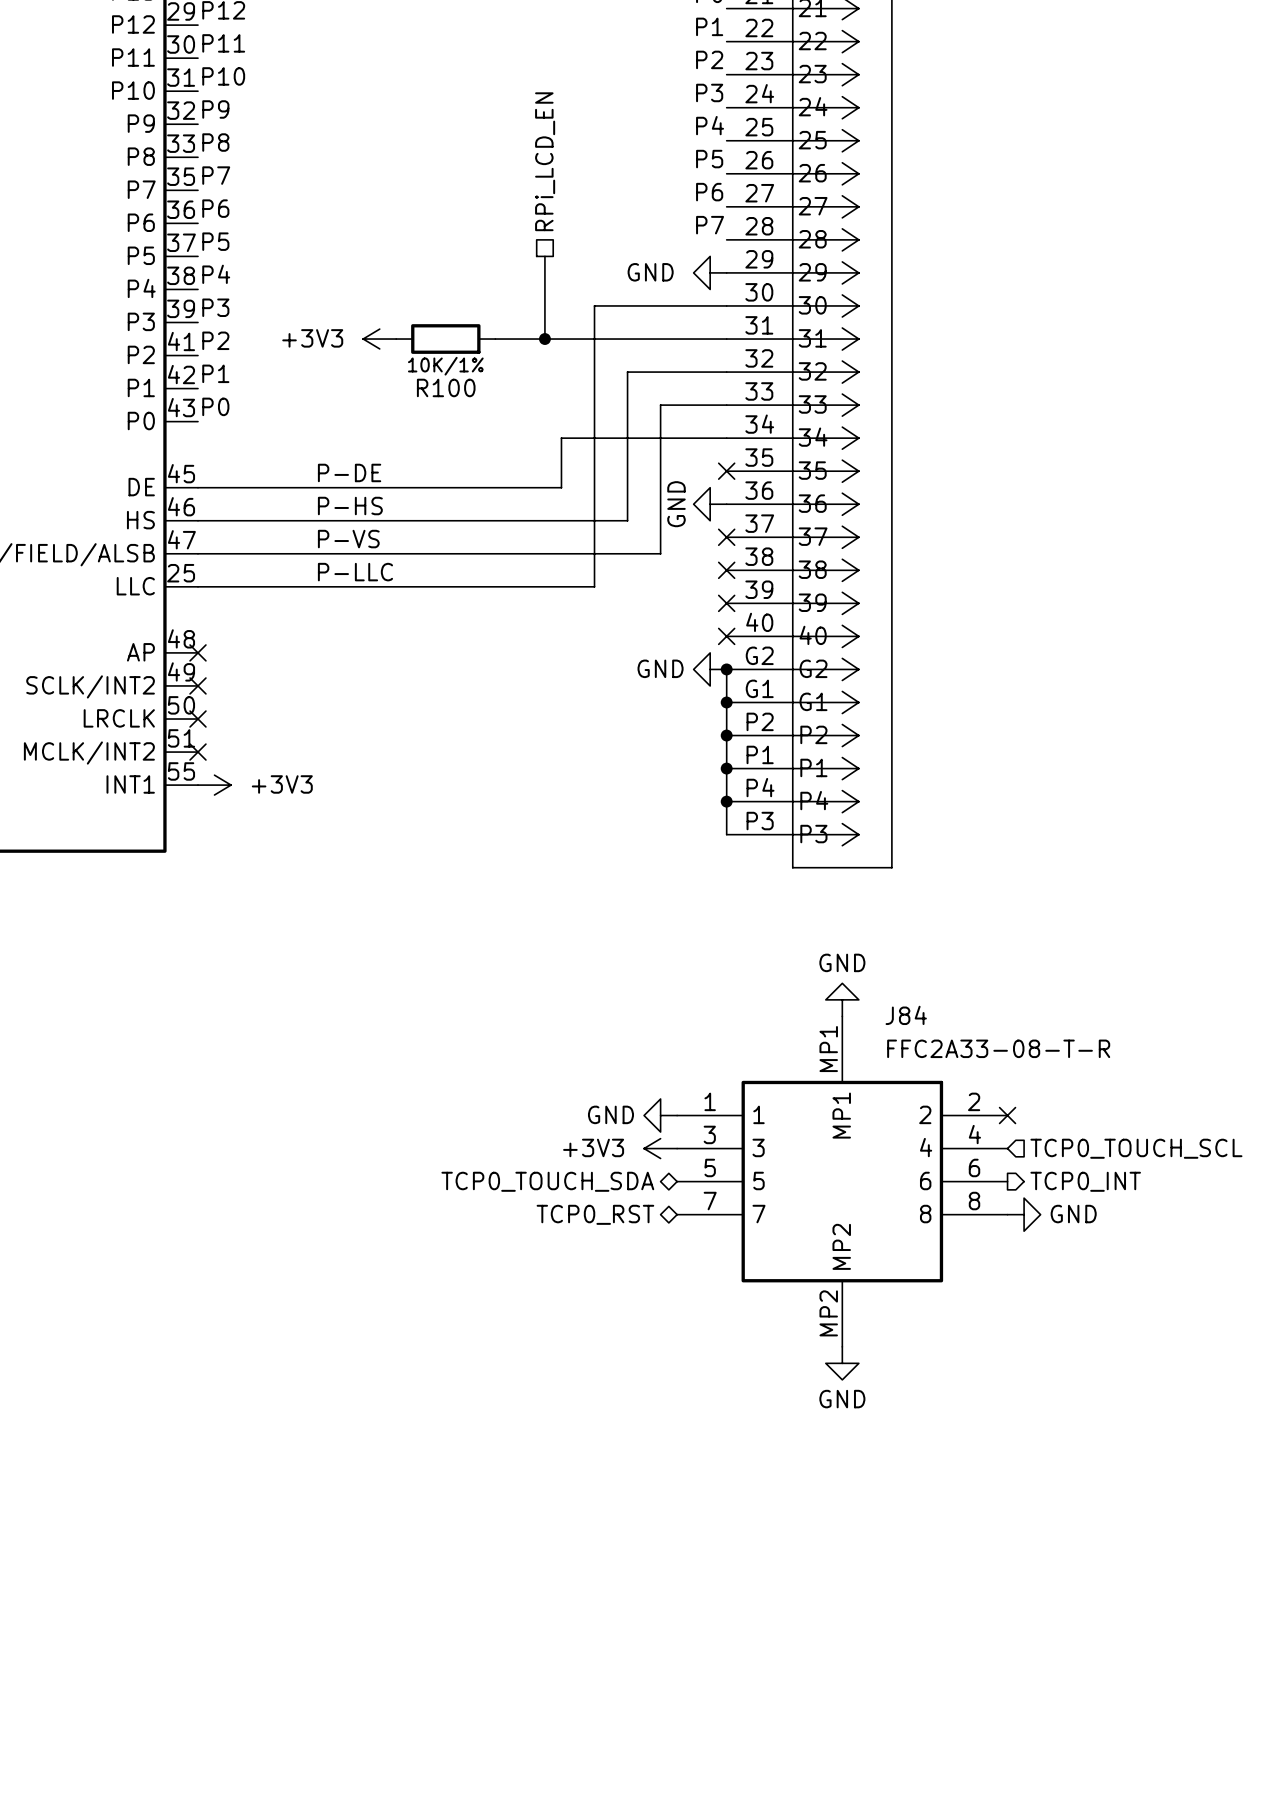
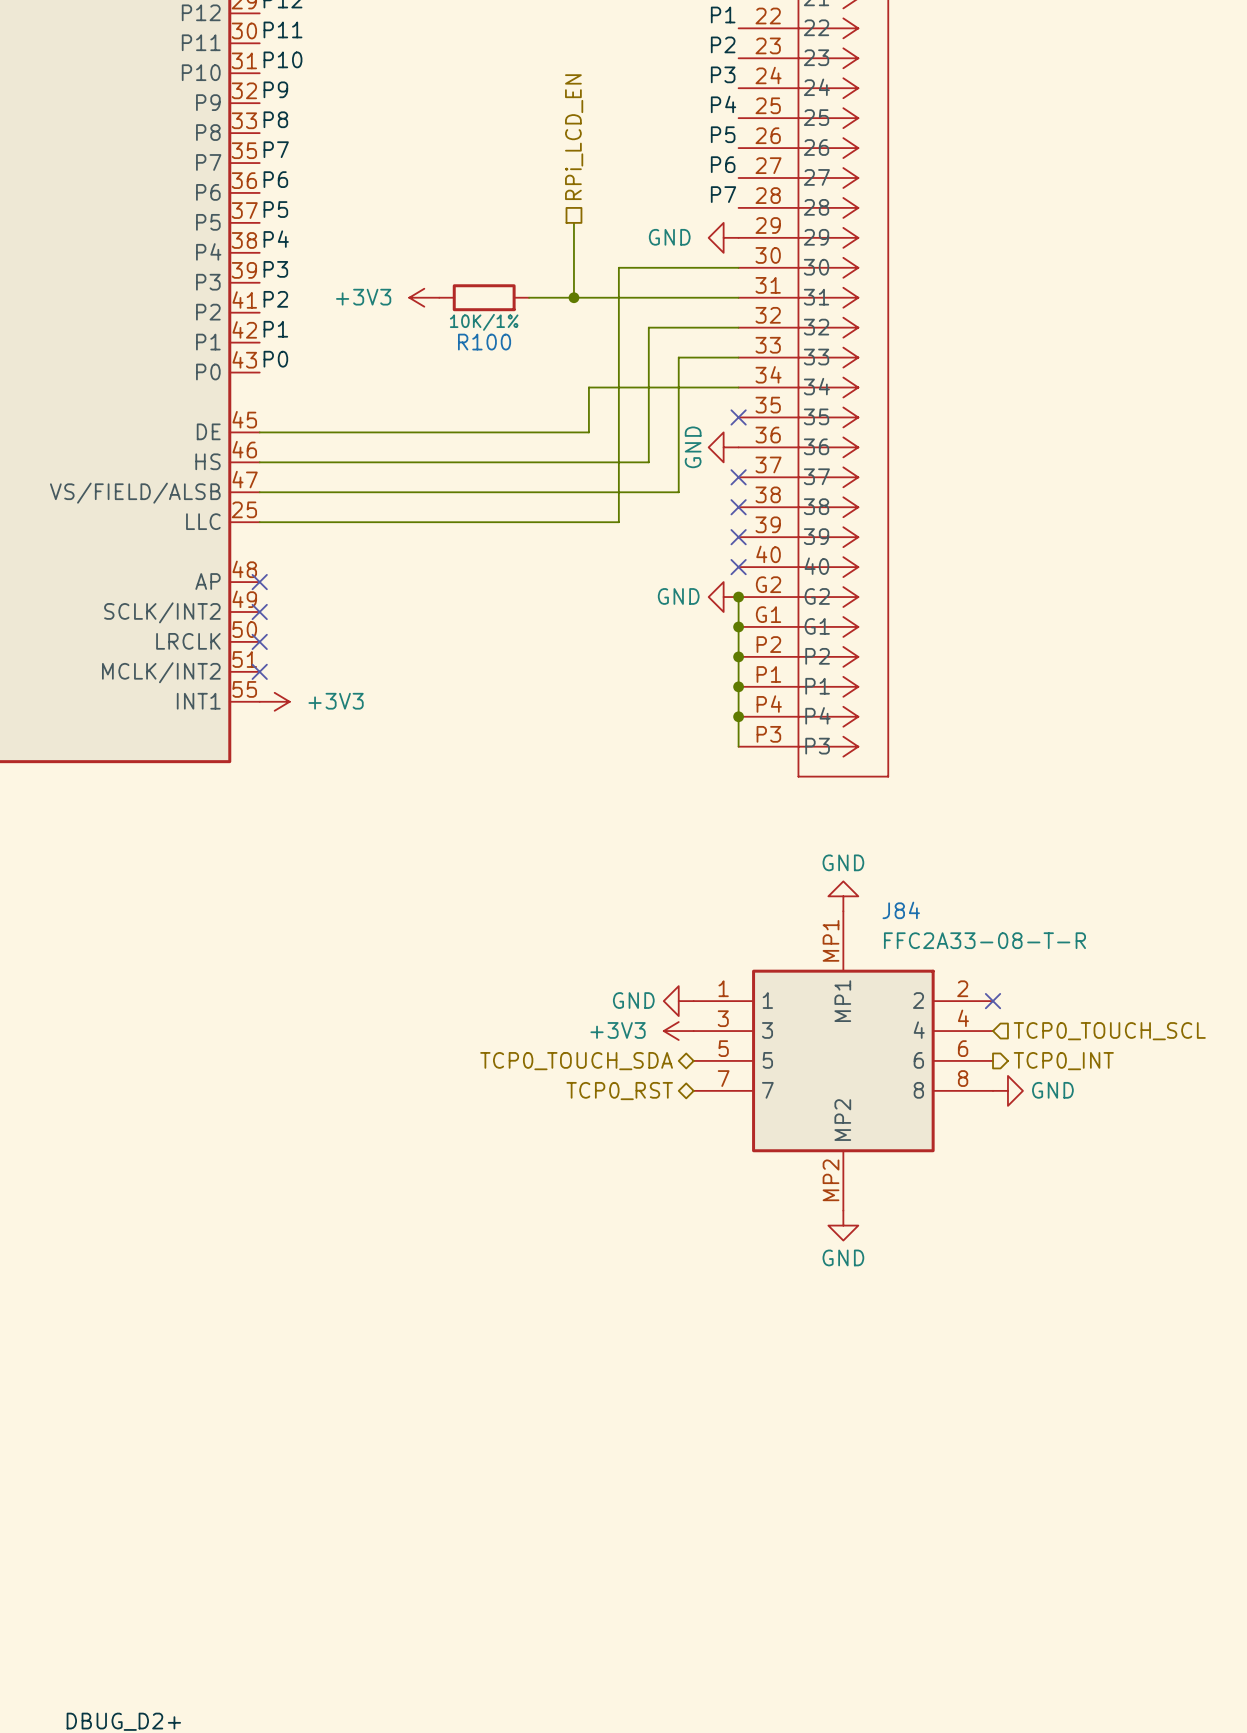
label: P-DE (349, 472) -> none
label: P-HS (350, 506) -> none
label: P-VS (348, 539) -> none
label: P-LLC (355, 572) -> none

